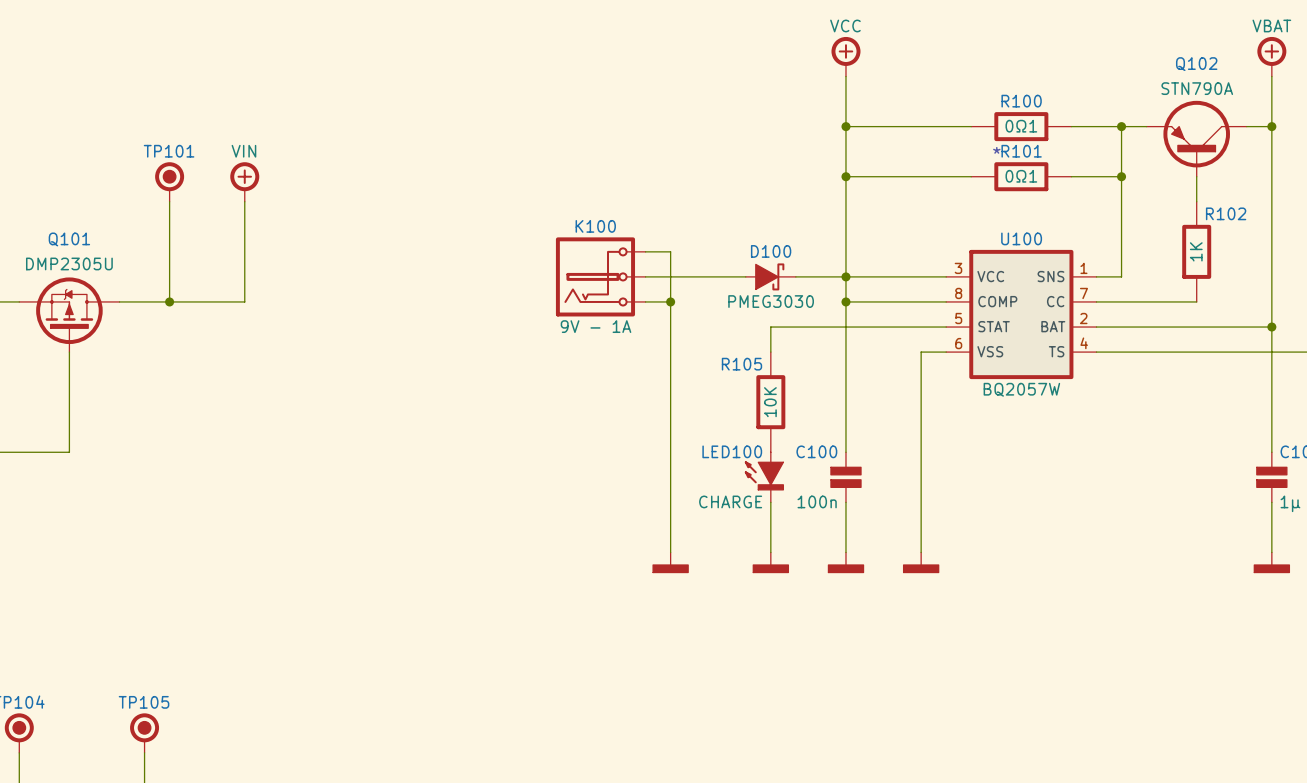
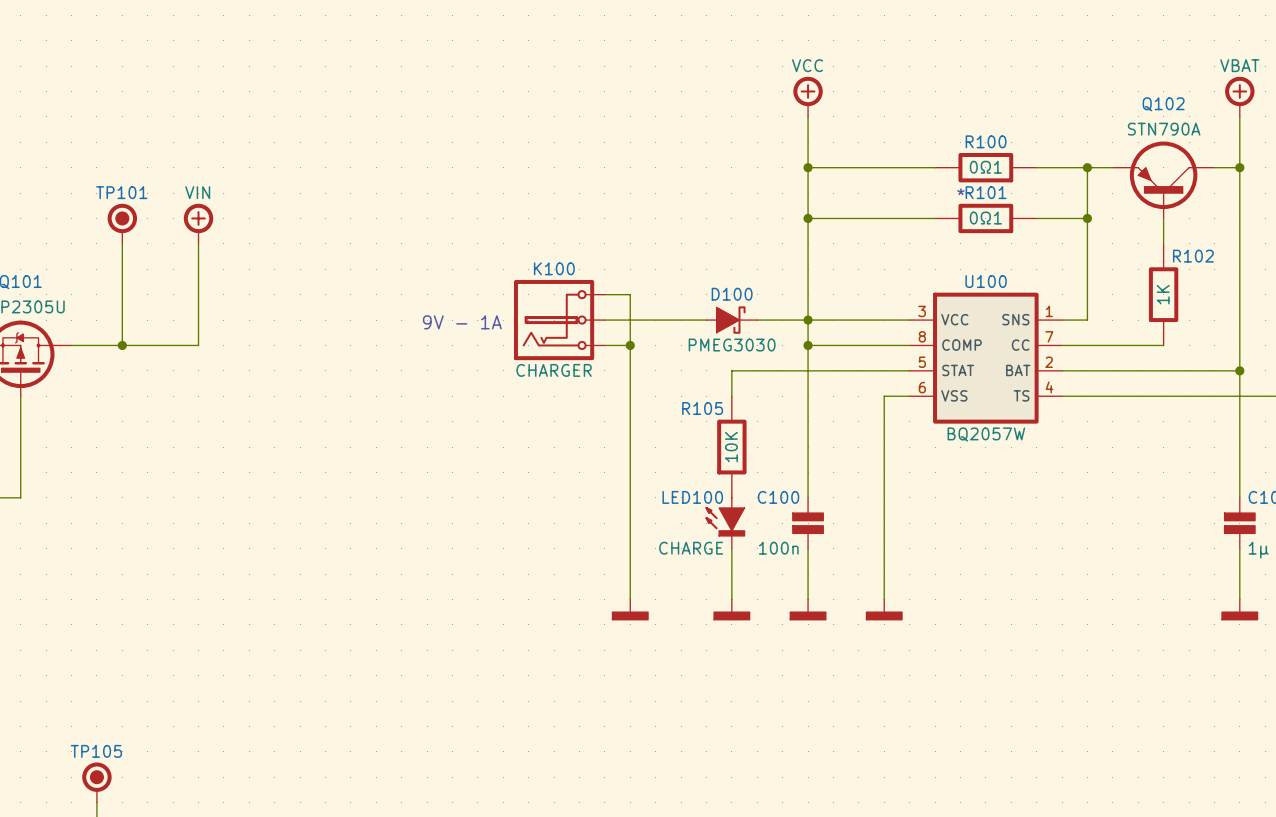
text: none -> 9V - 1A (462, 322)
K100 value: 9V - 1A (596, 326) -> CHARGER (554, 370)

